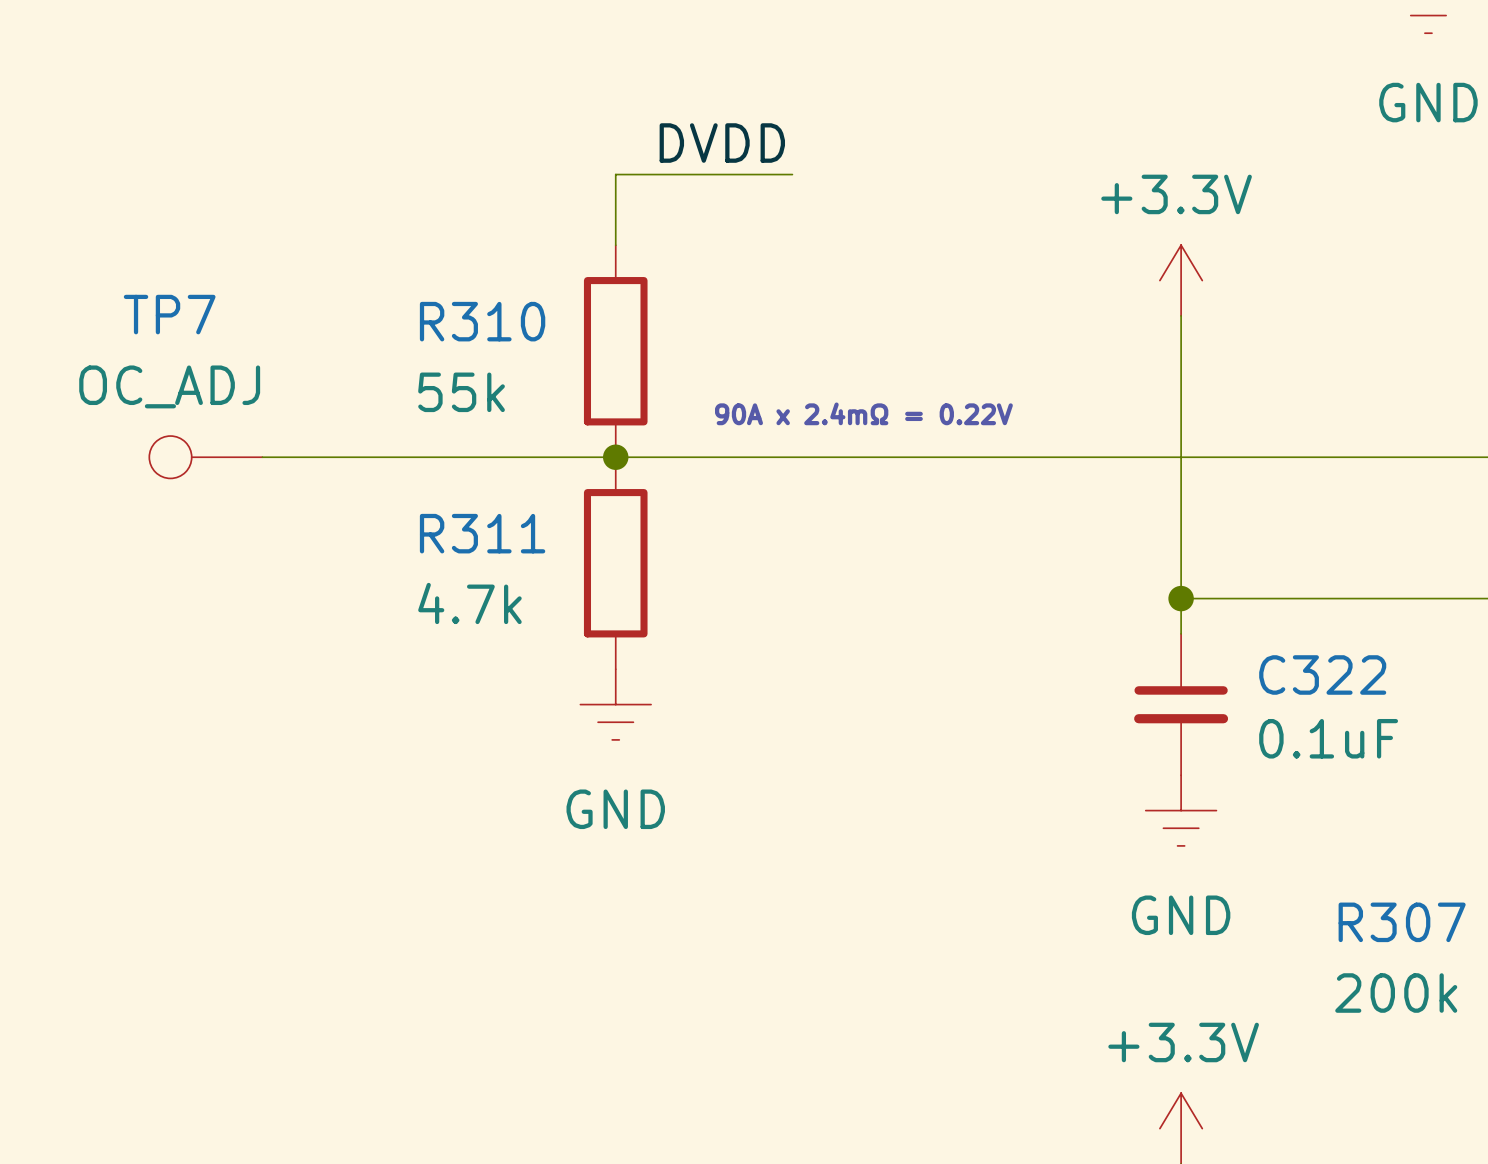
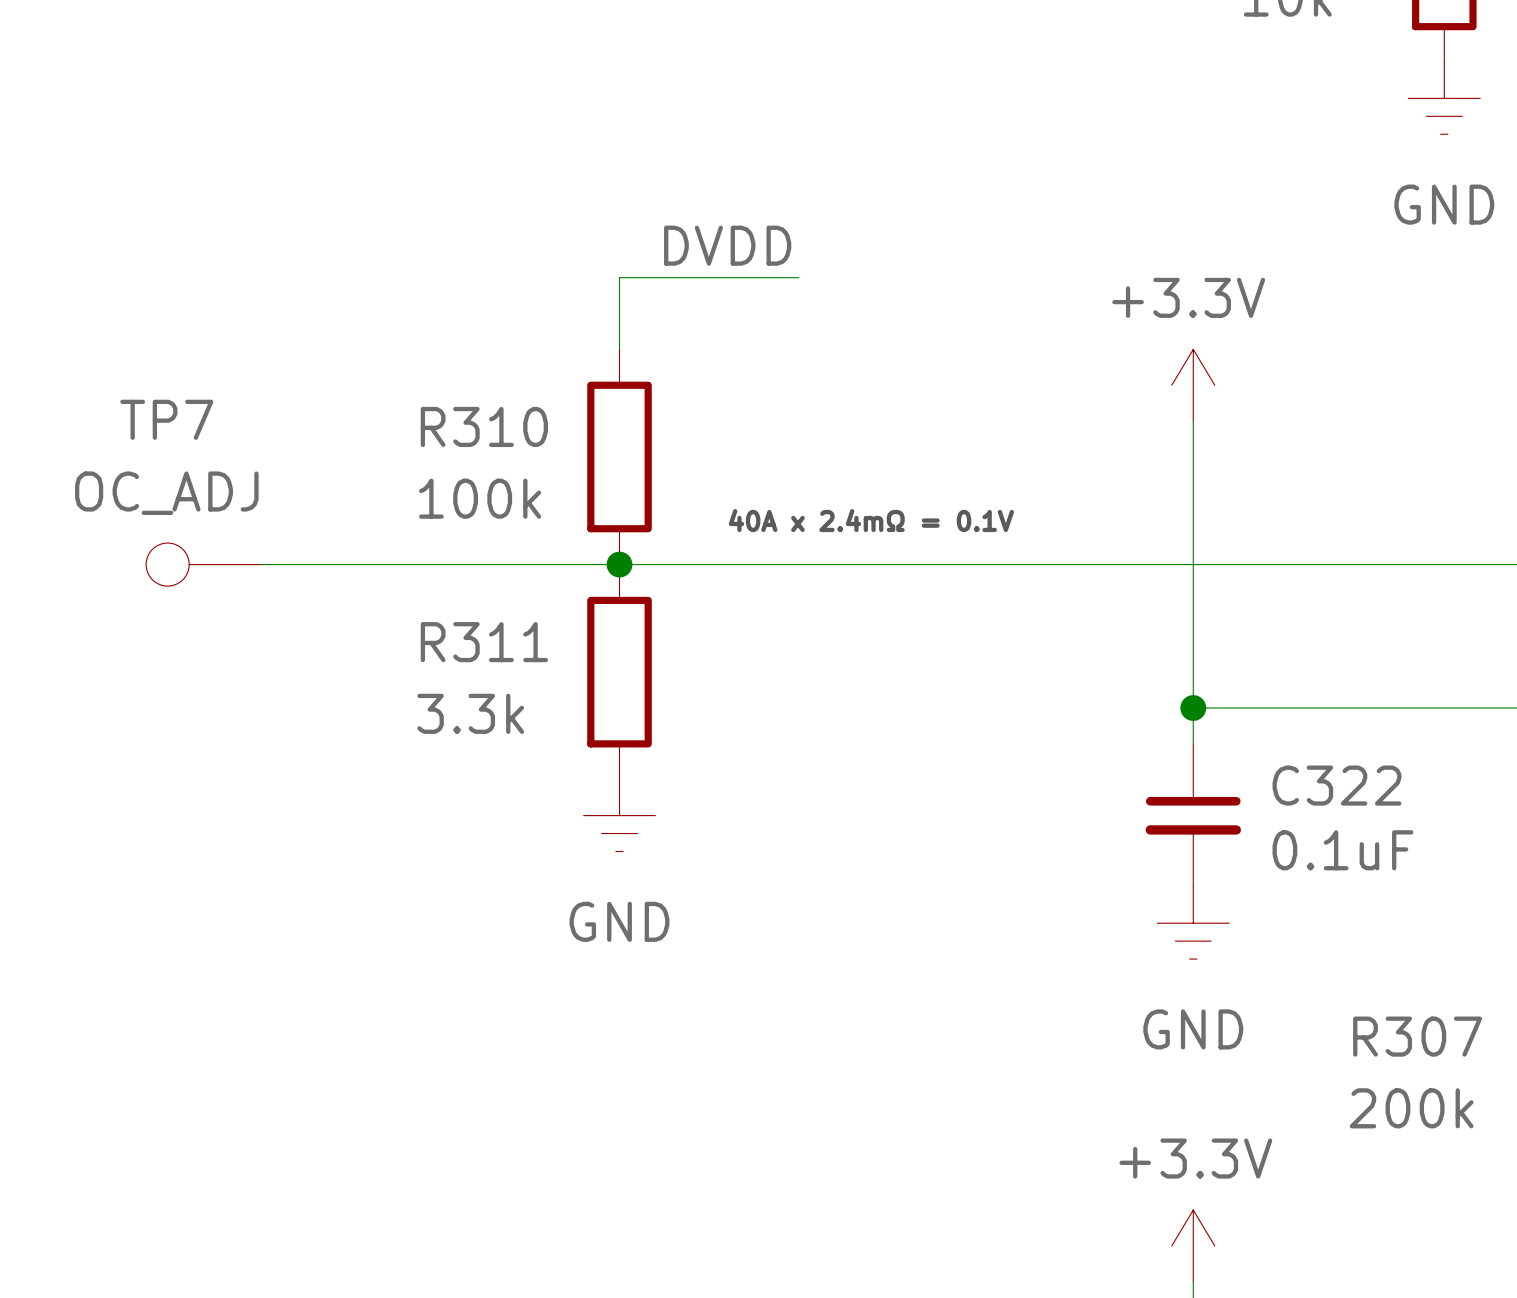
R310 value: 55k (461, 392) -> 100k (480, 498)
text: 90A x 2.4mΩ = 0.22V (863, 413) -> 40A x 2.4mΩ = 0.1V (871, 520)
R311 value: 4.7k (469, 603) -> 3.3k (470, 713)

